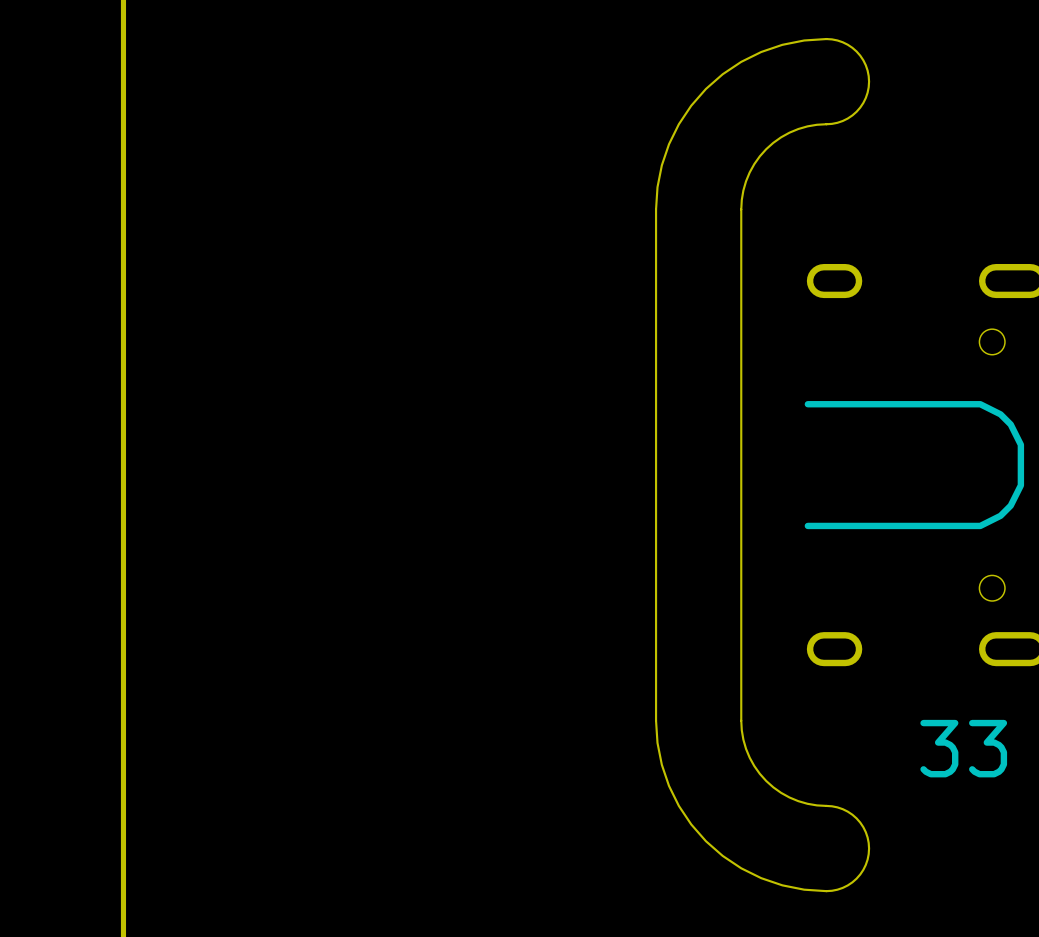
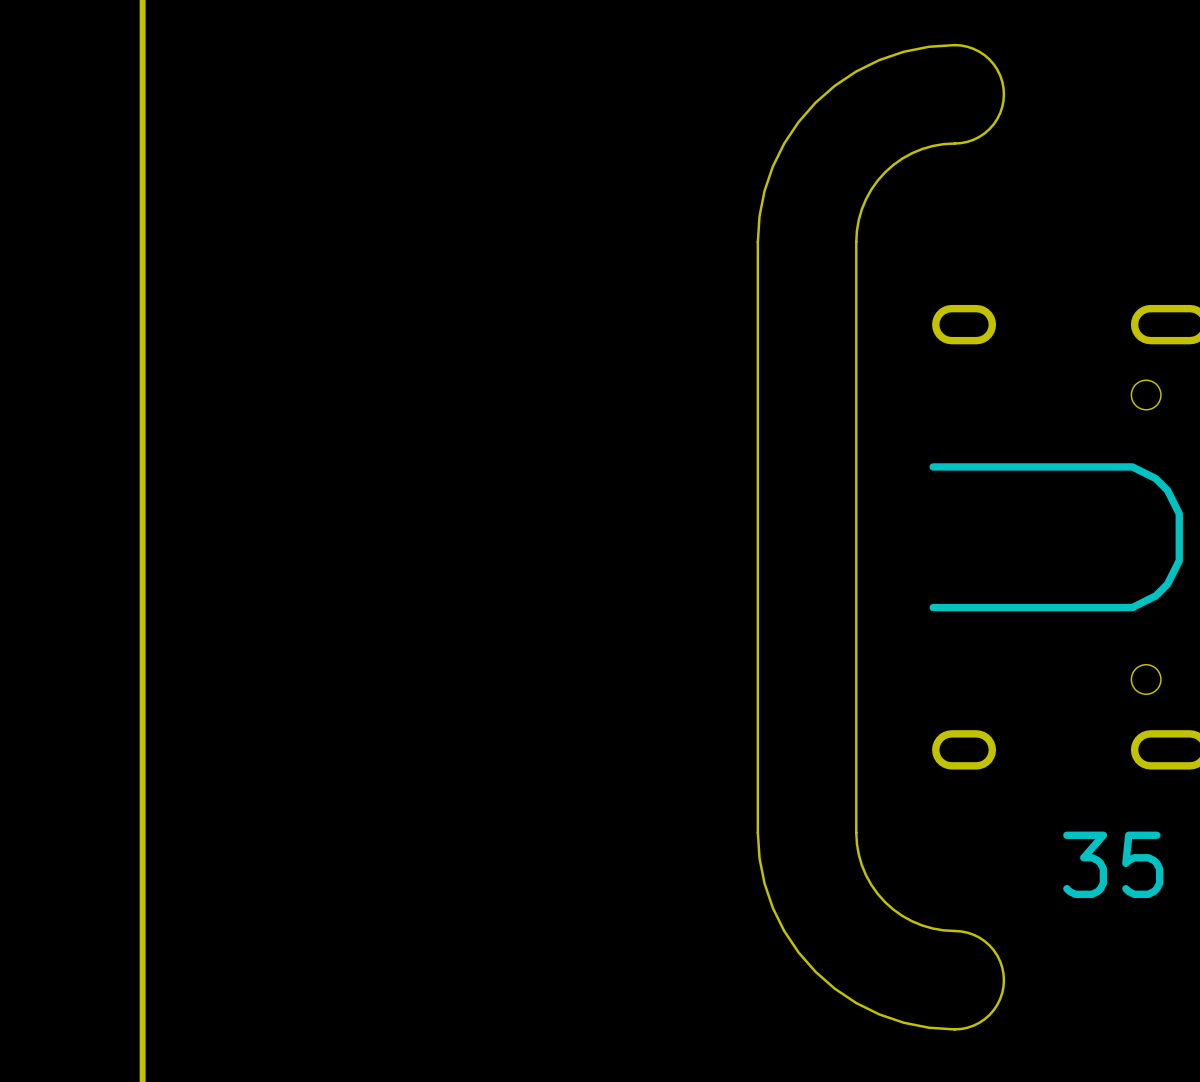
text: 33 (963, 748) -> 35 (1113, 864)

